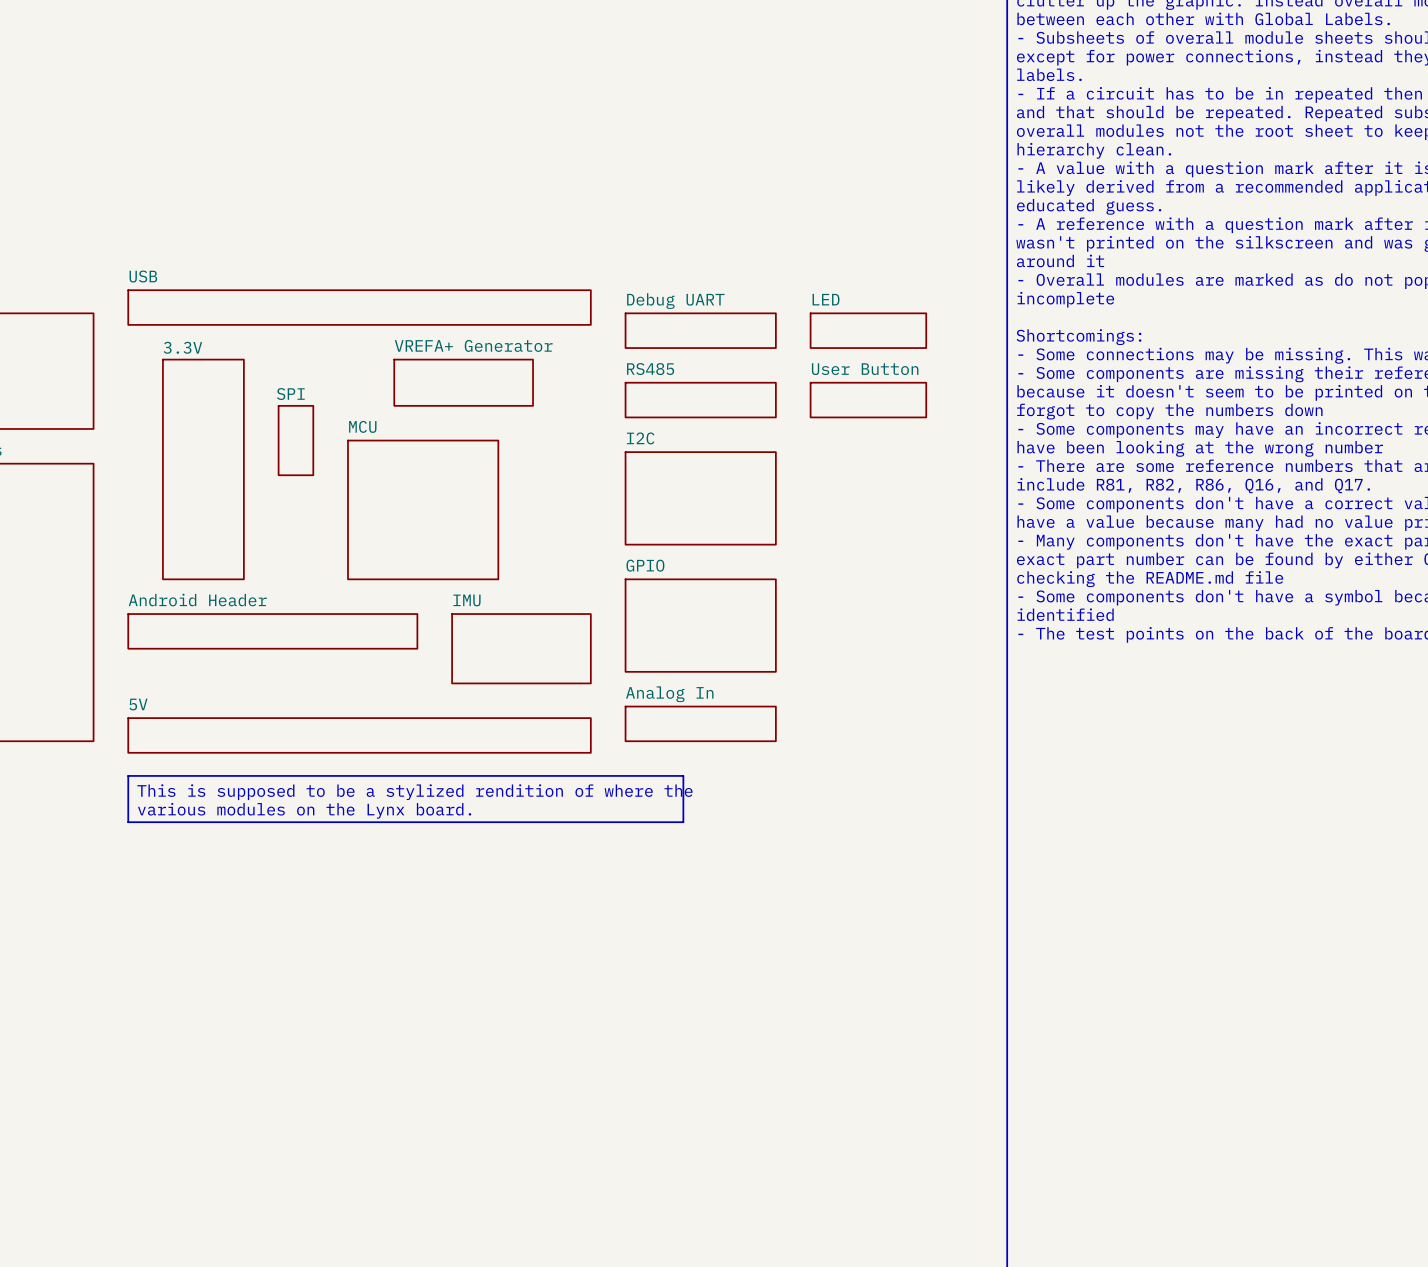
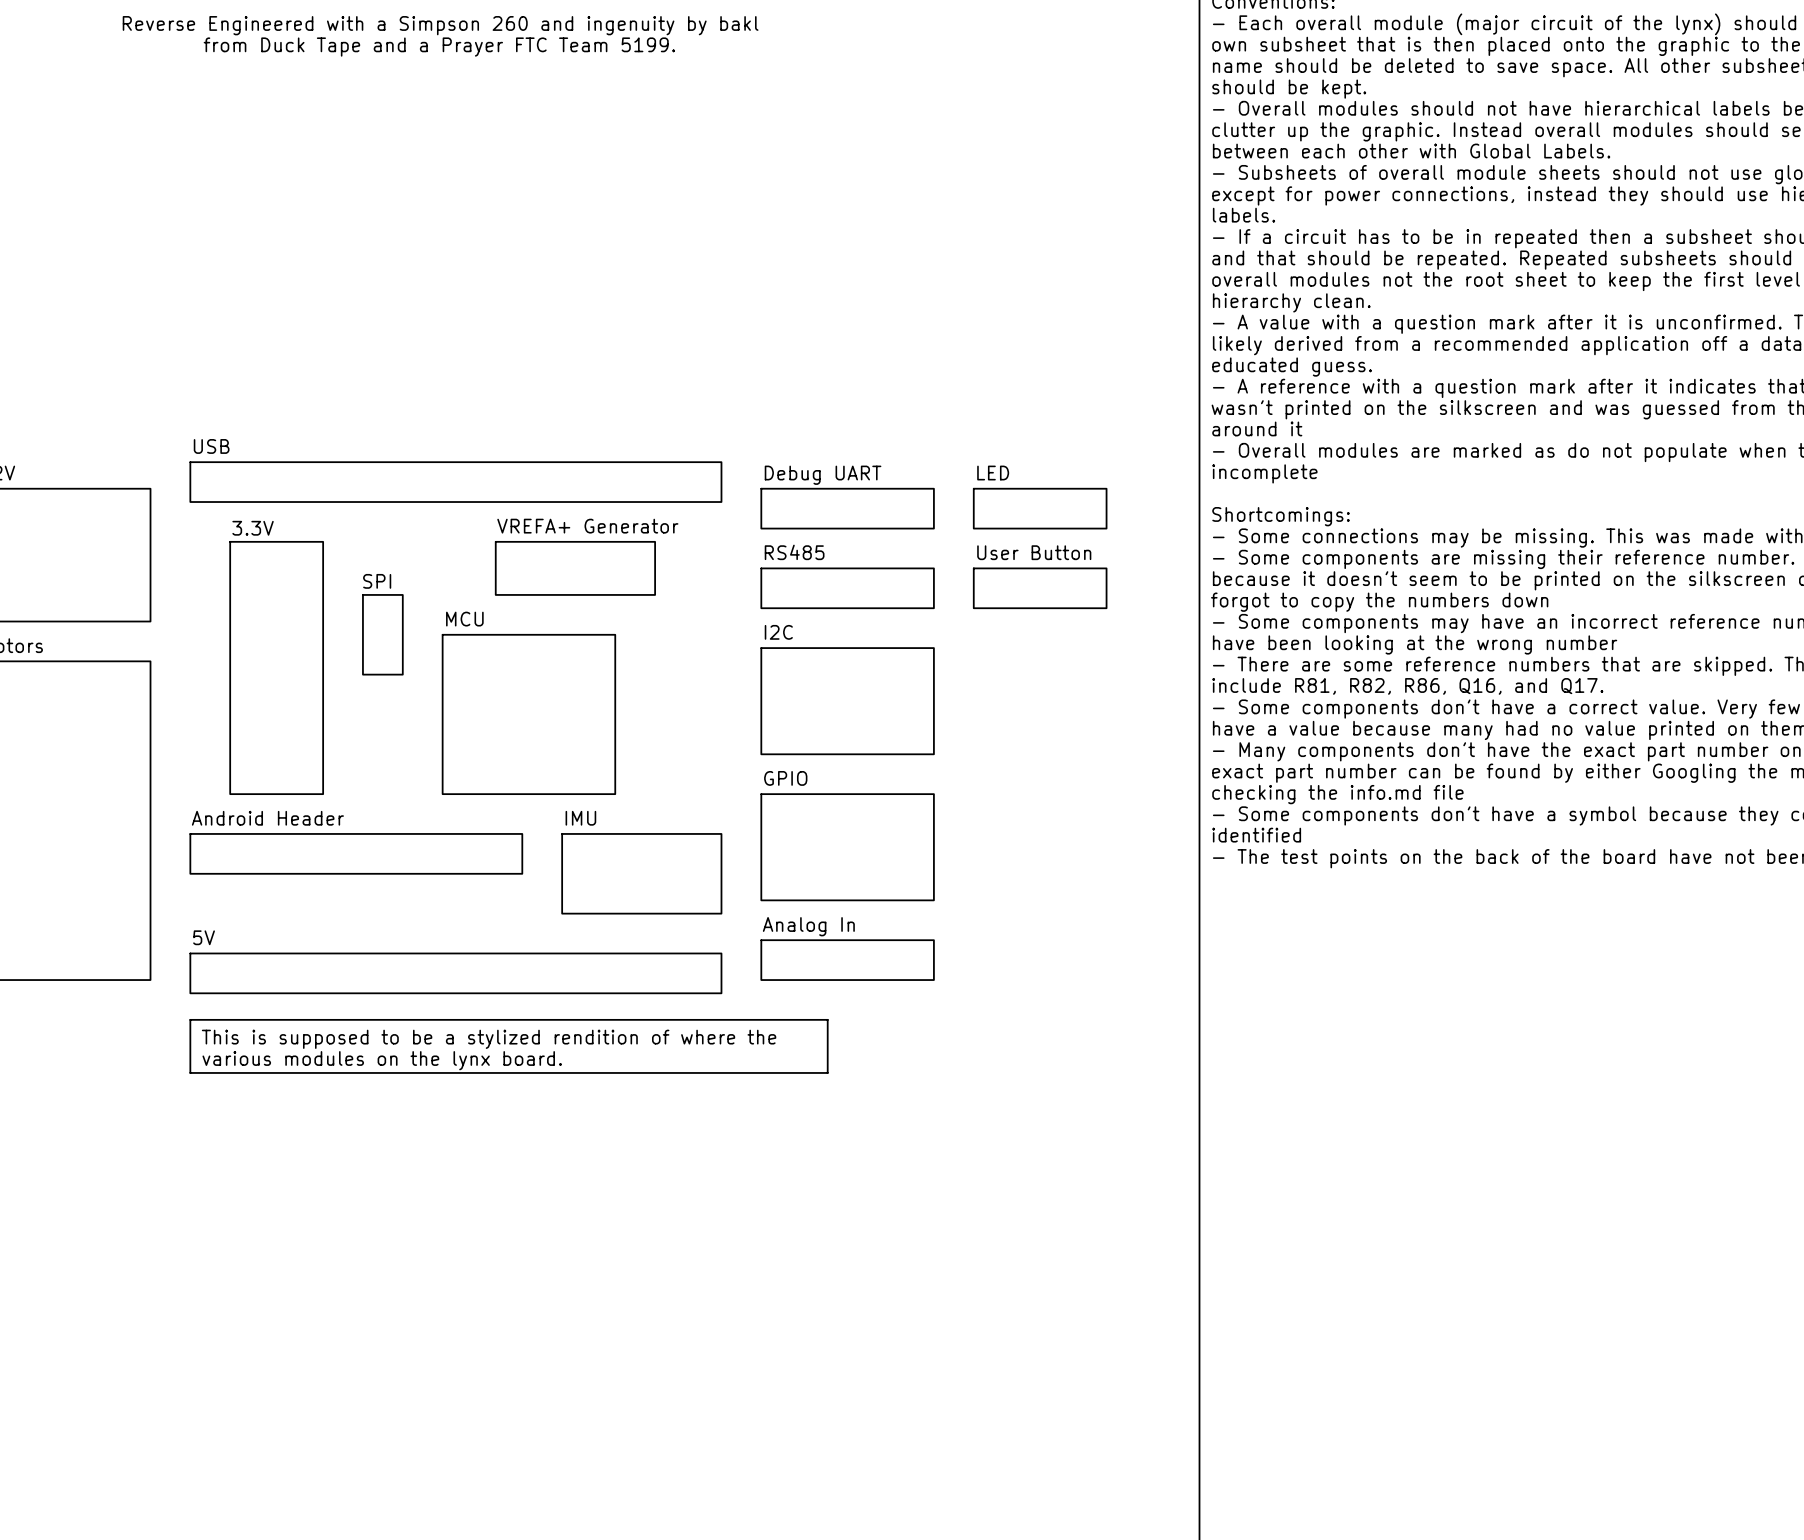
text: checking the README.md file (1150, 579) -> checking the info.md file (1337, 794)
text: various modules on the Lynx board. (304, 810) -> various modules on the lynx board. (382, 1060)

